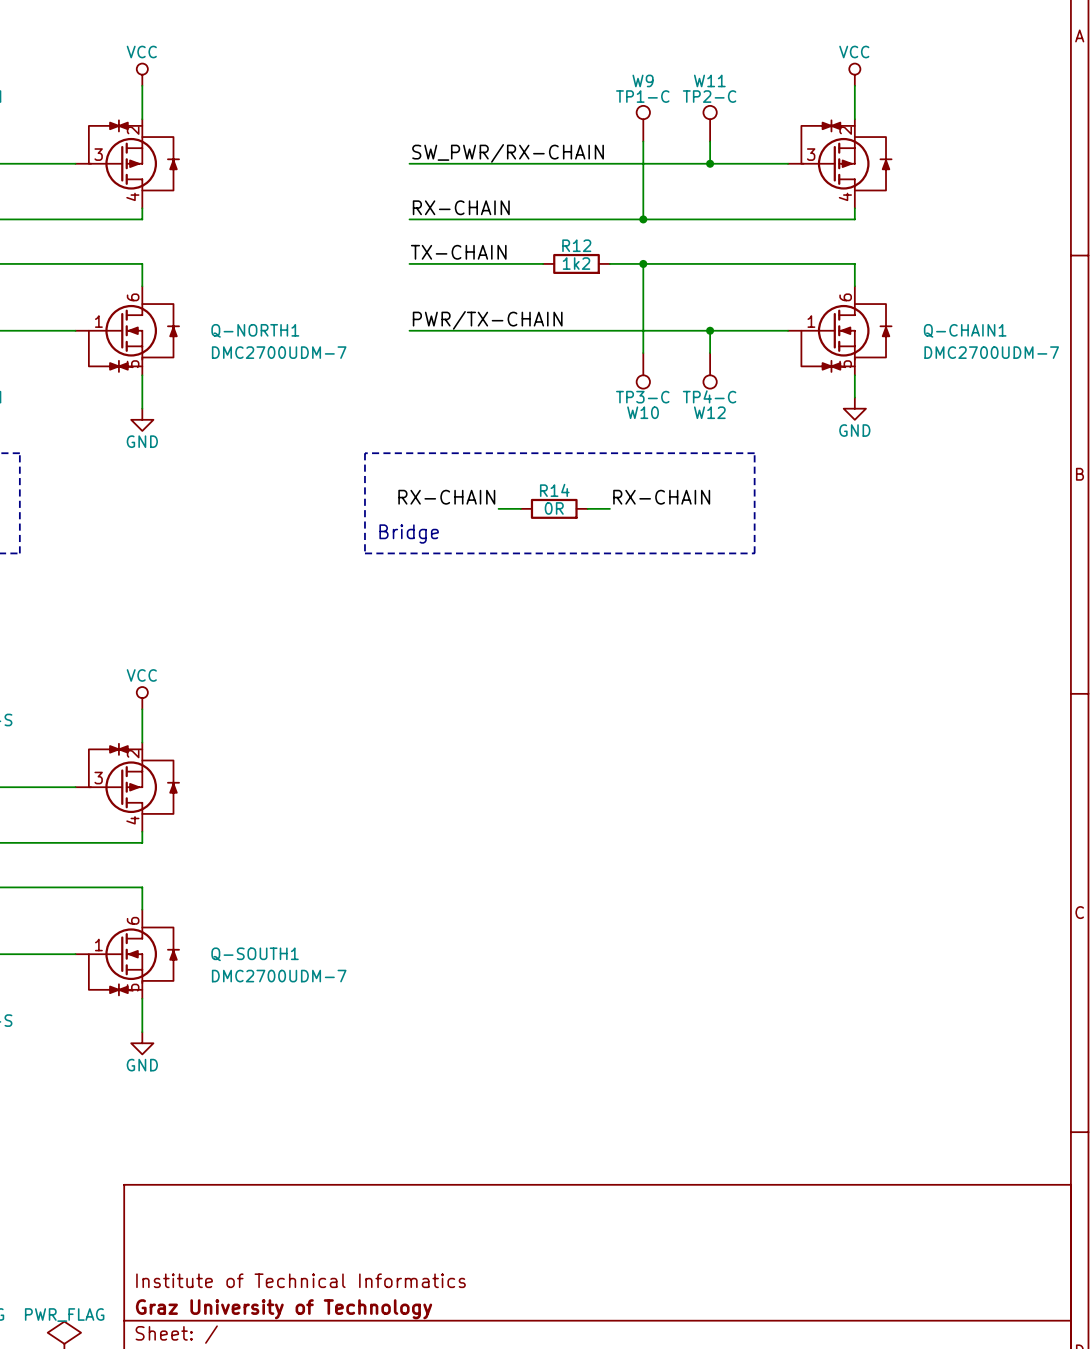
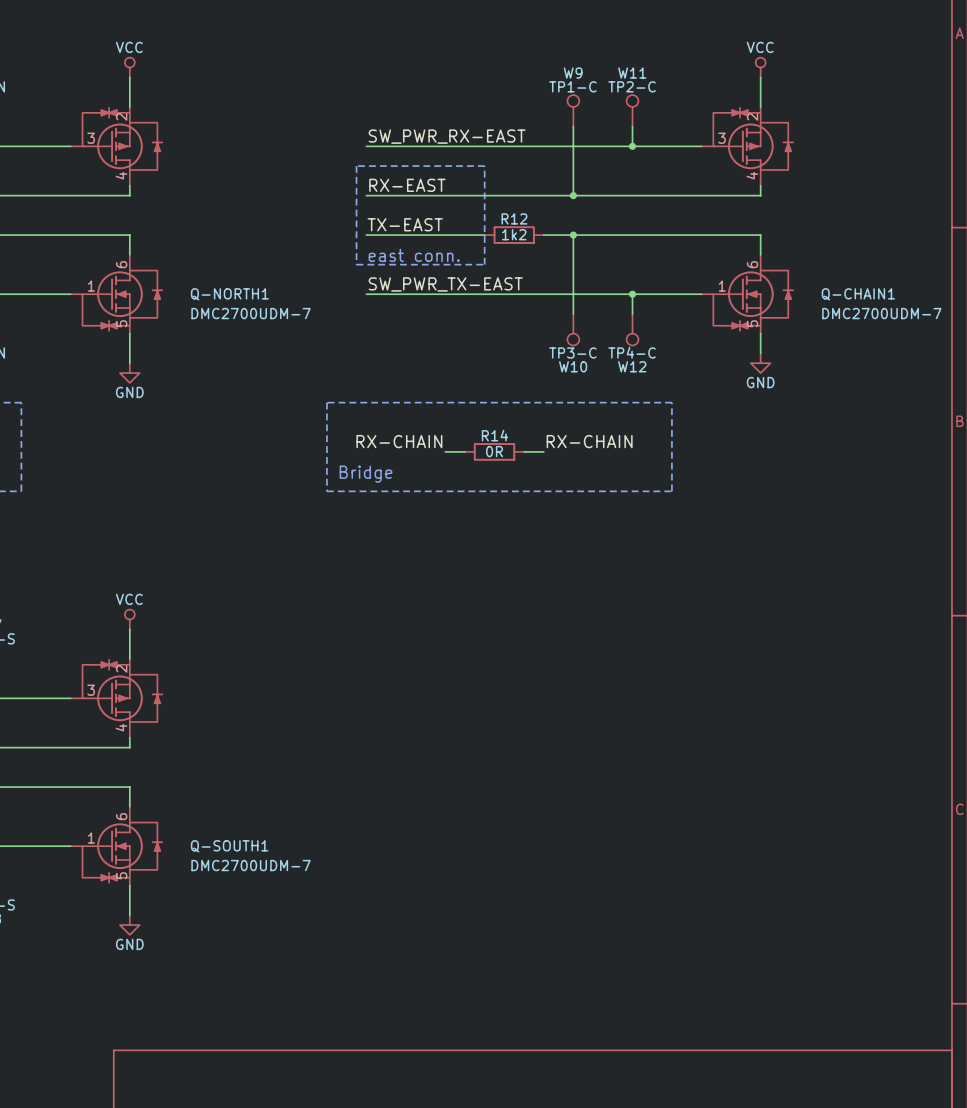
label: SW_PWR/RX-CHAIN (508, 153) -> SW_PWR_RX-EAST (447, 136)
line: none -> (356, 166) (484, 166) (484, 264) (356, 264) (356, 166)
label: RX-CHAIN (461, 207) -> RX-EAST (407, 185)
label: TX-CHAIN (458, 252) -> TX-EAST (405, 224)
text: none -> east conn. (414, 255)
label: PWR/TX-CHAIN (487, 320) -> SW_PWR_TX-EAST (445, 284)

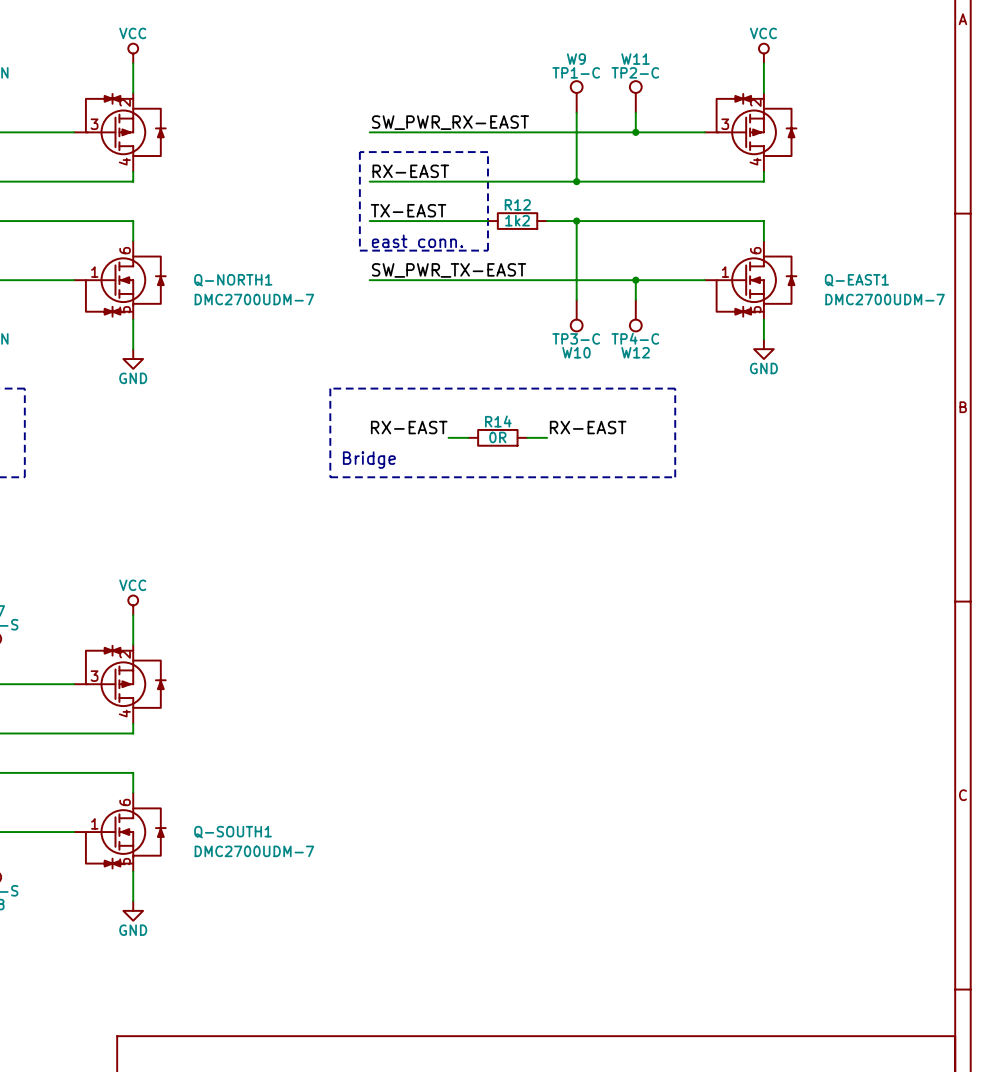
Q-CHAIN1 name: Q-CHAIN1 (858, 294) -> Q-EAST1 (856, 280)
label: RX-CHAIN (399, 441) -> RX-EAST (409, 427)
label: RX-CHAIN (589, 441) -> RX-EAST (588, 427)

